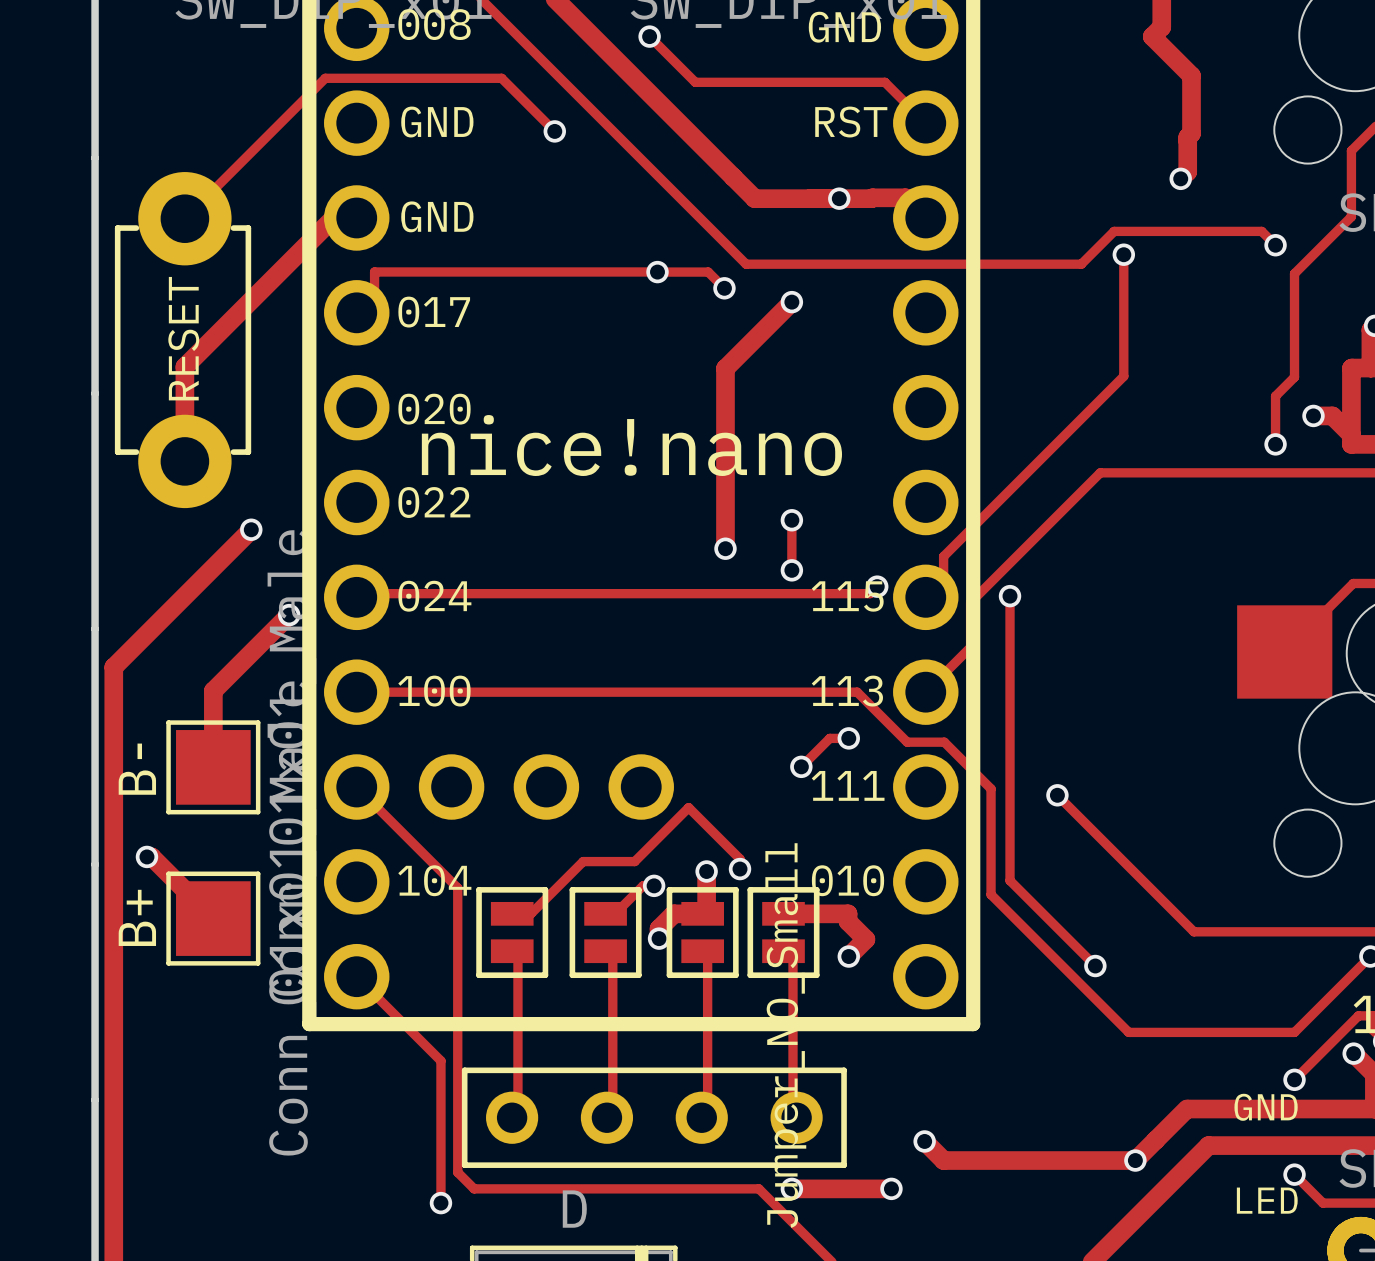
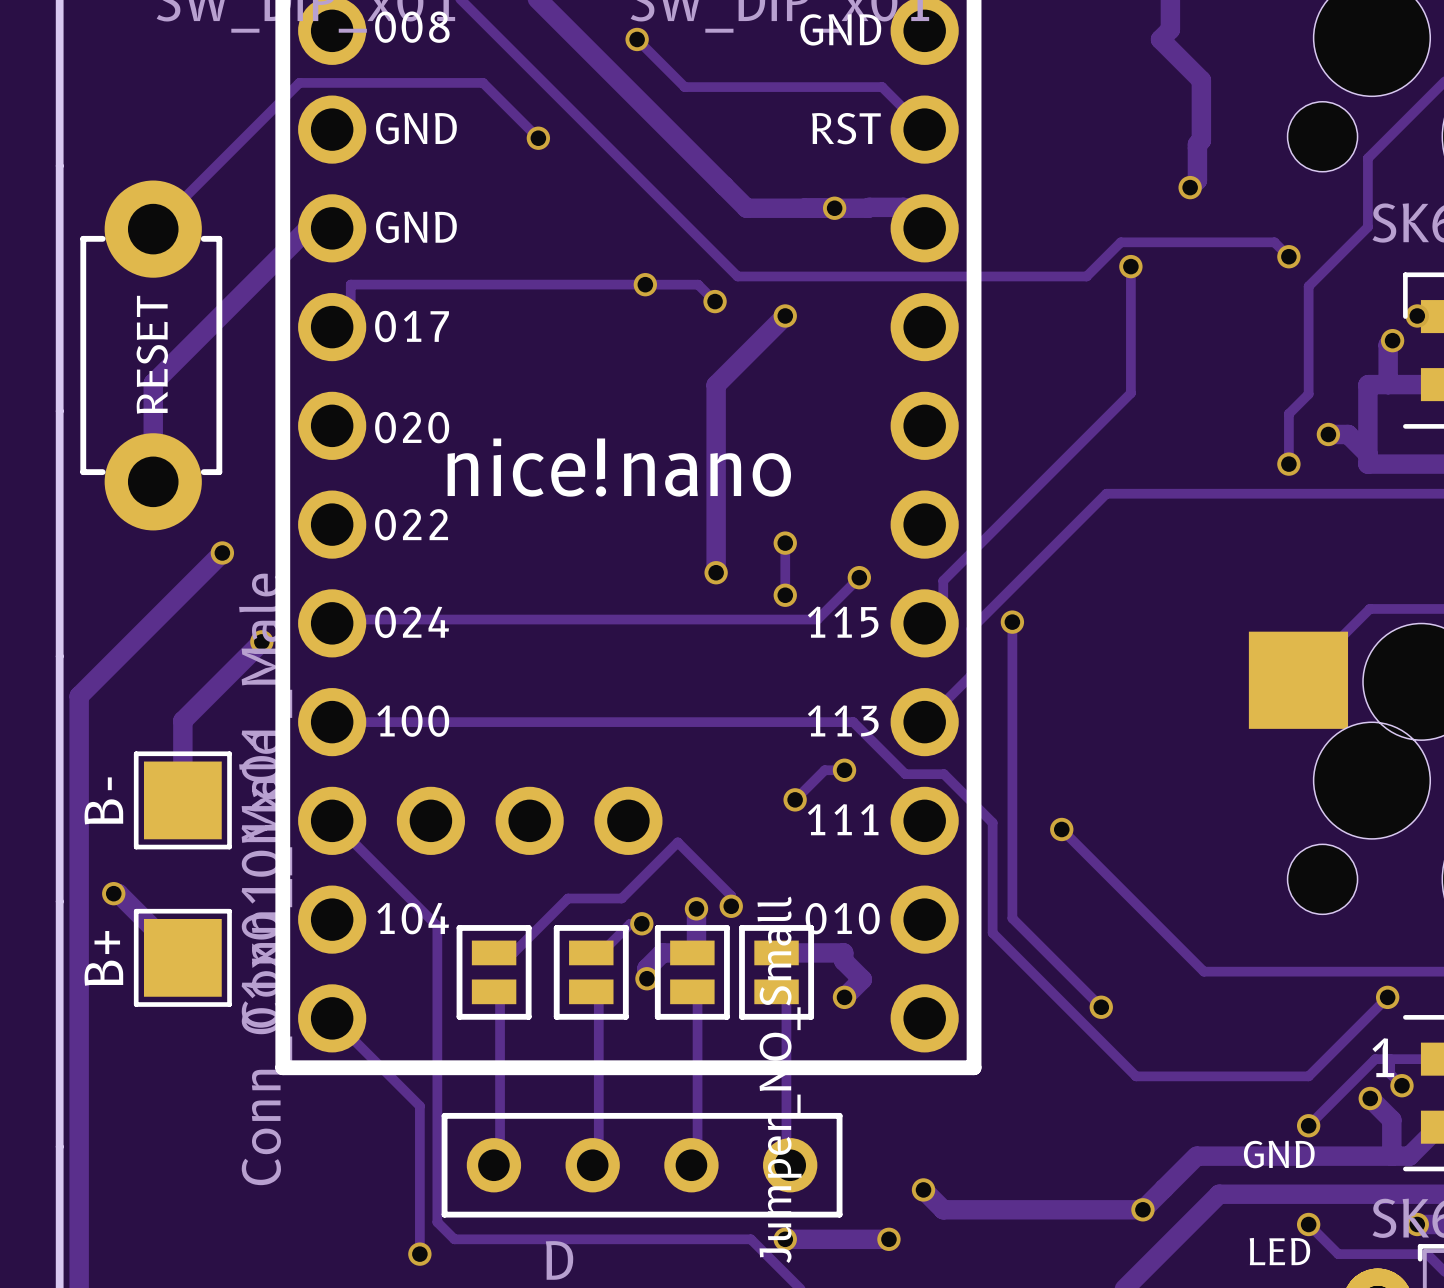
track: (877, 586) (870, 593) (822, 593) -> (859, 577) (817, 619)
via position: (877, 586) -> (859, 577)

